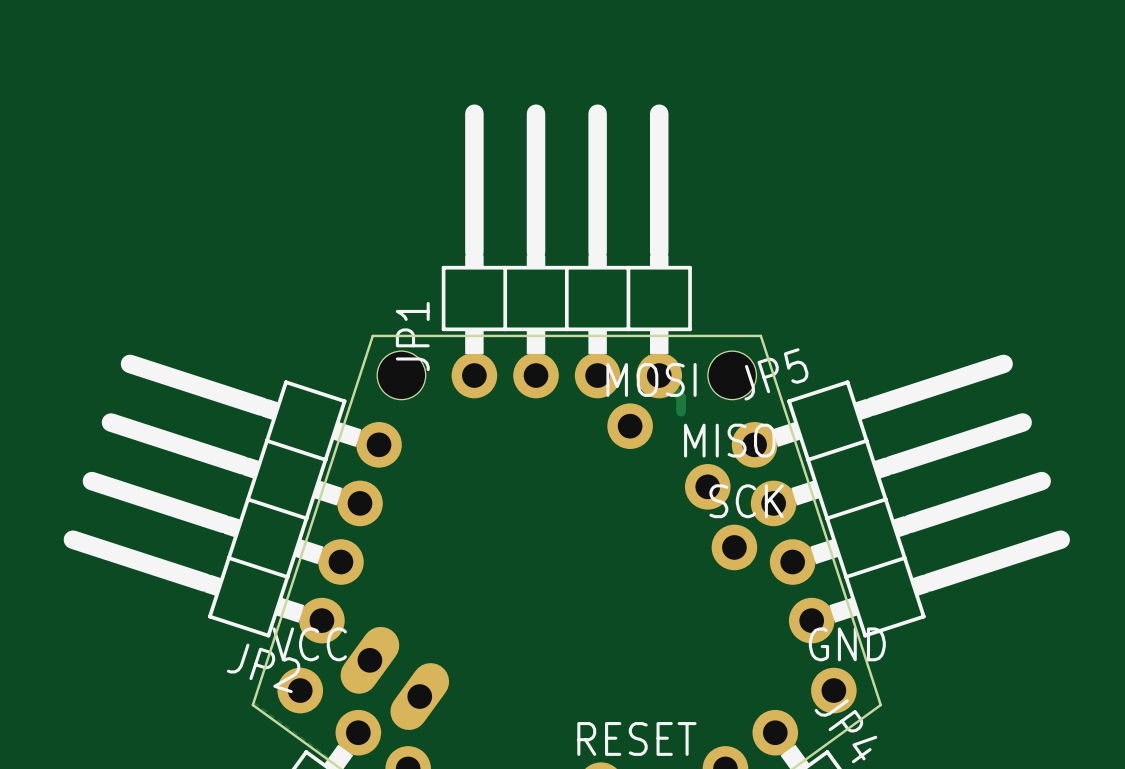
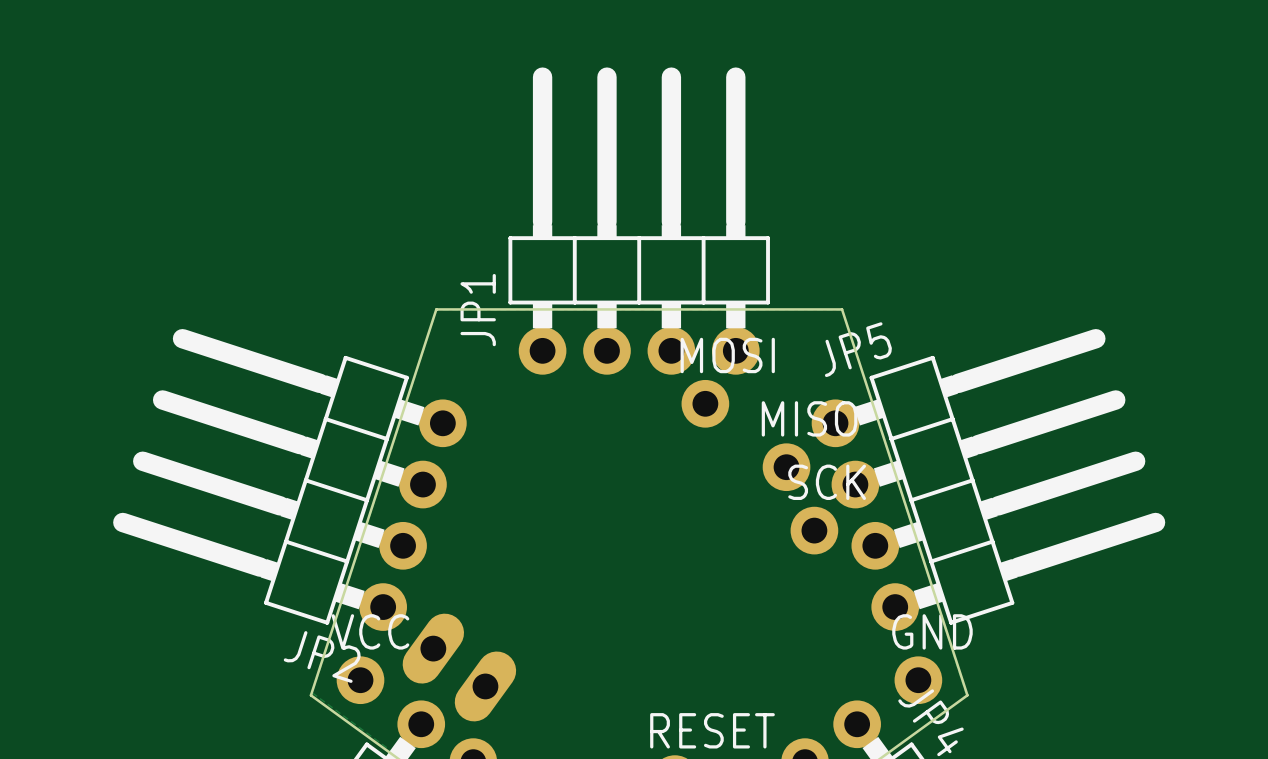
hole: (401, 375) -> none
track: (659, 375) (681, 397) (681, 411) -> none
hole: (732, 375) -> none

